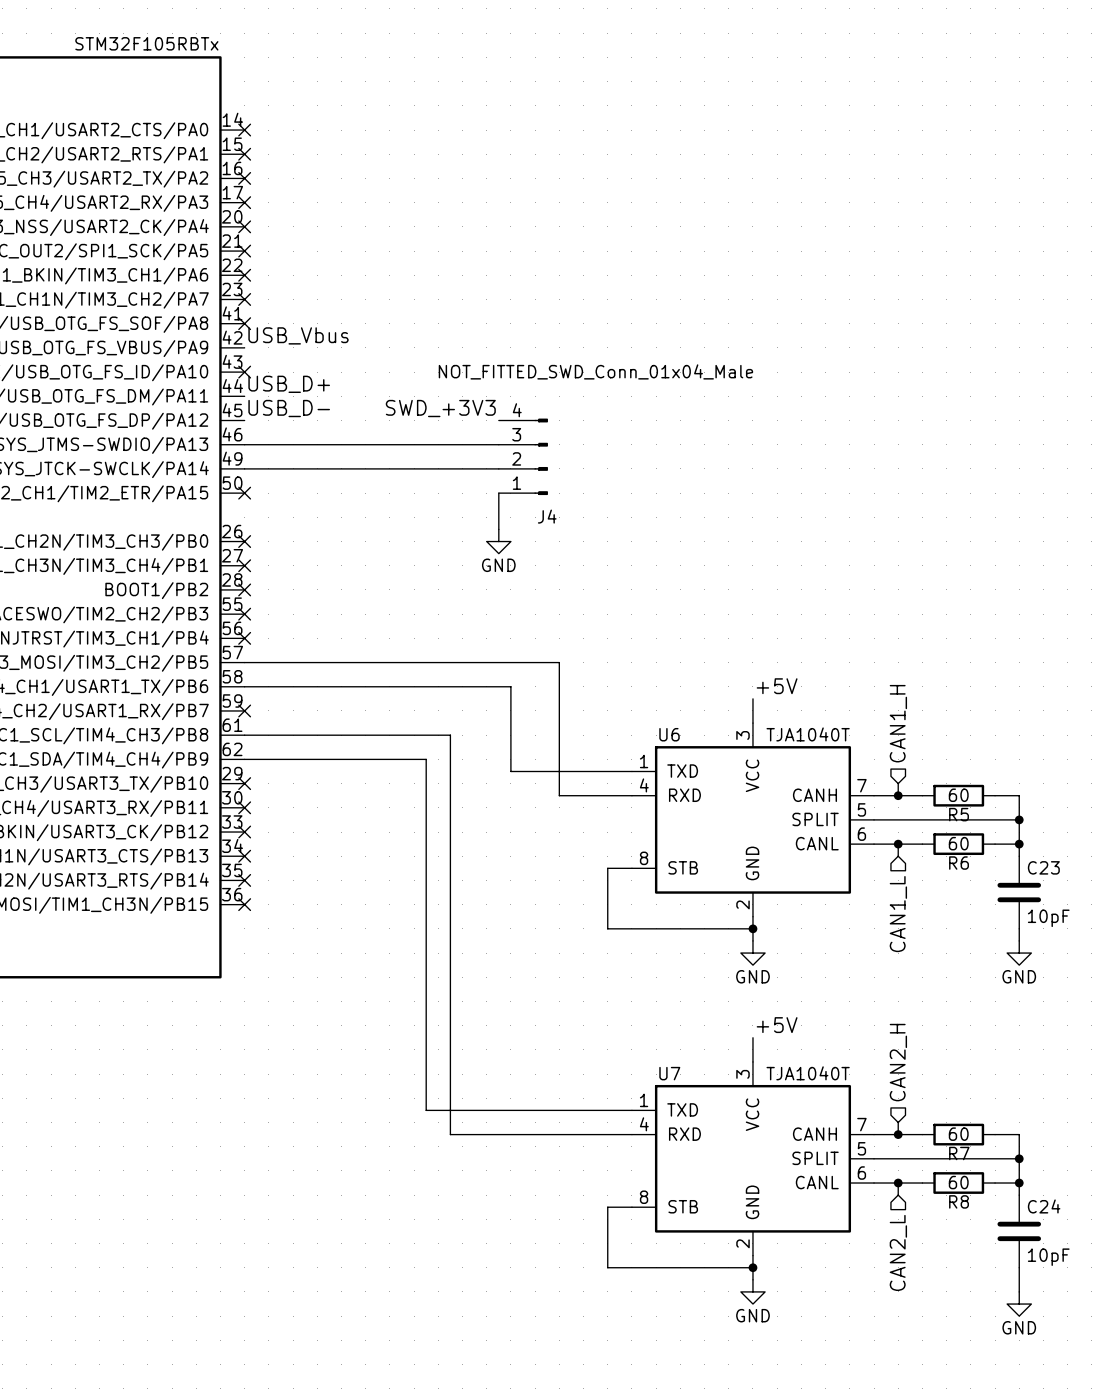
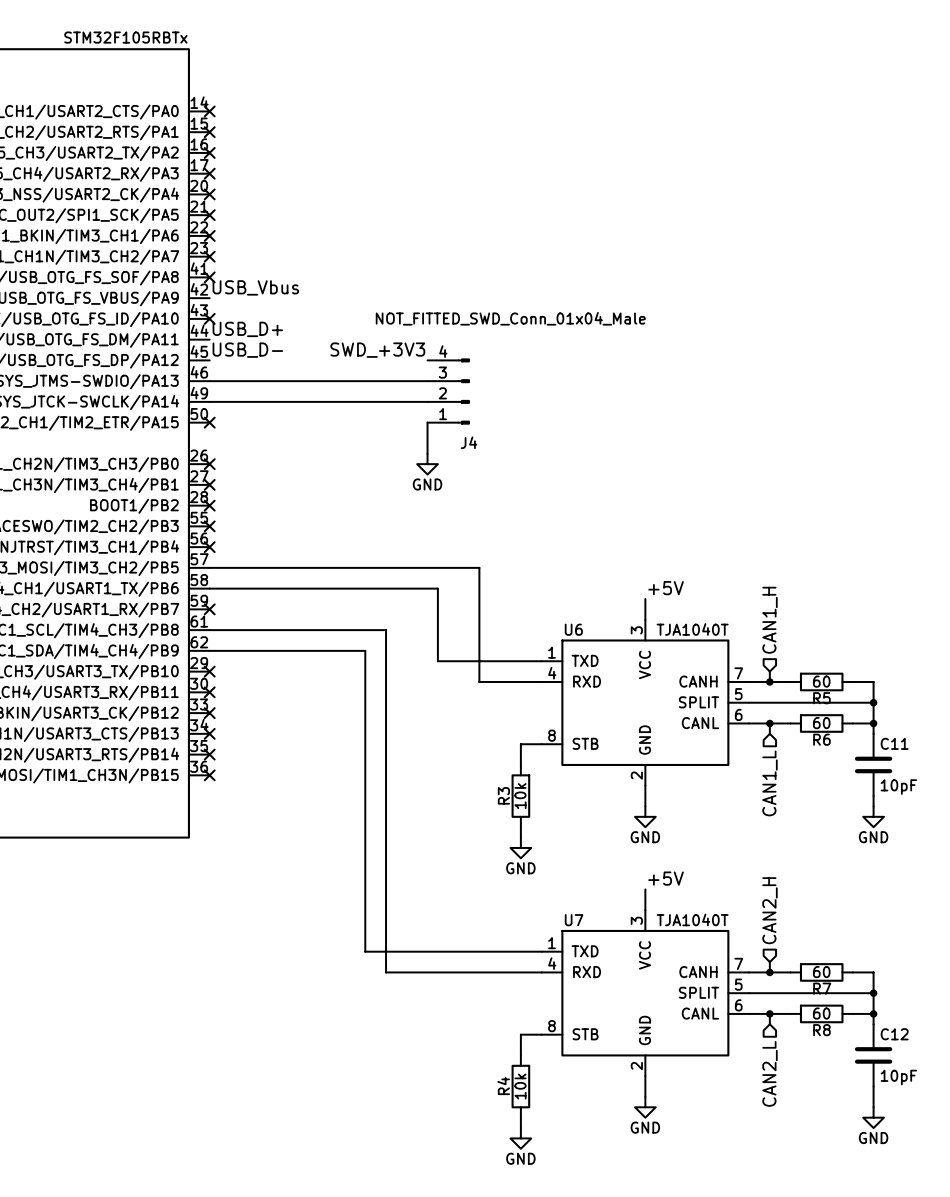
C23 name: C23 (1043, 867) -> C11 (894, 743)
wire: (607, 892) (607, 928) (752, 928) -> none
R3: none -> 10k (520, 796)
junction: (752, 928) -> none
wire: none -> (520, 827) (520, 837)
power symbol: none -> GND (520, 847)
C24 name: C24 (1044, 1206) -> C12 (894, 1034)
wire: (607, 1231) (607, 1267) (752, 1267) -> none
R4: none -> 10k (520, 1086)
junction: (752, 1267) -> none
wire: none -> (520, 1117) (520, 1128)
power symbol: none -> GND (520, 1138)

